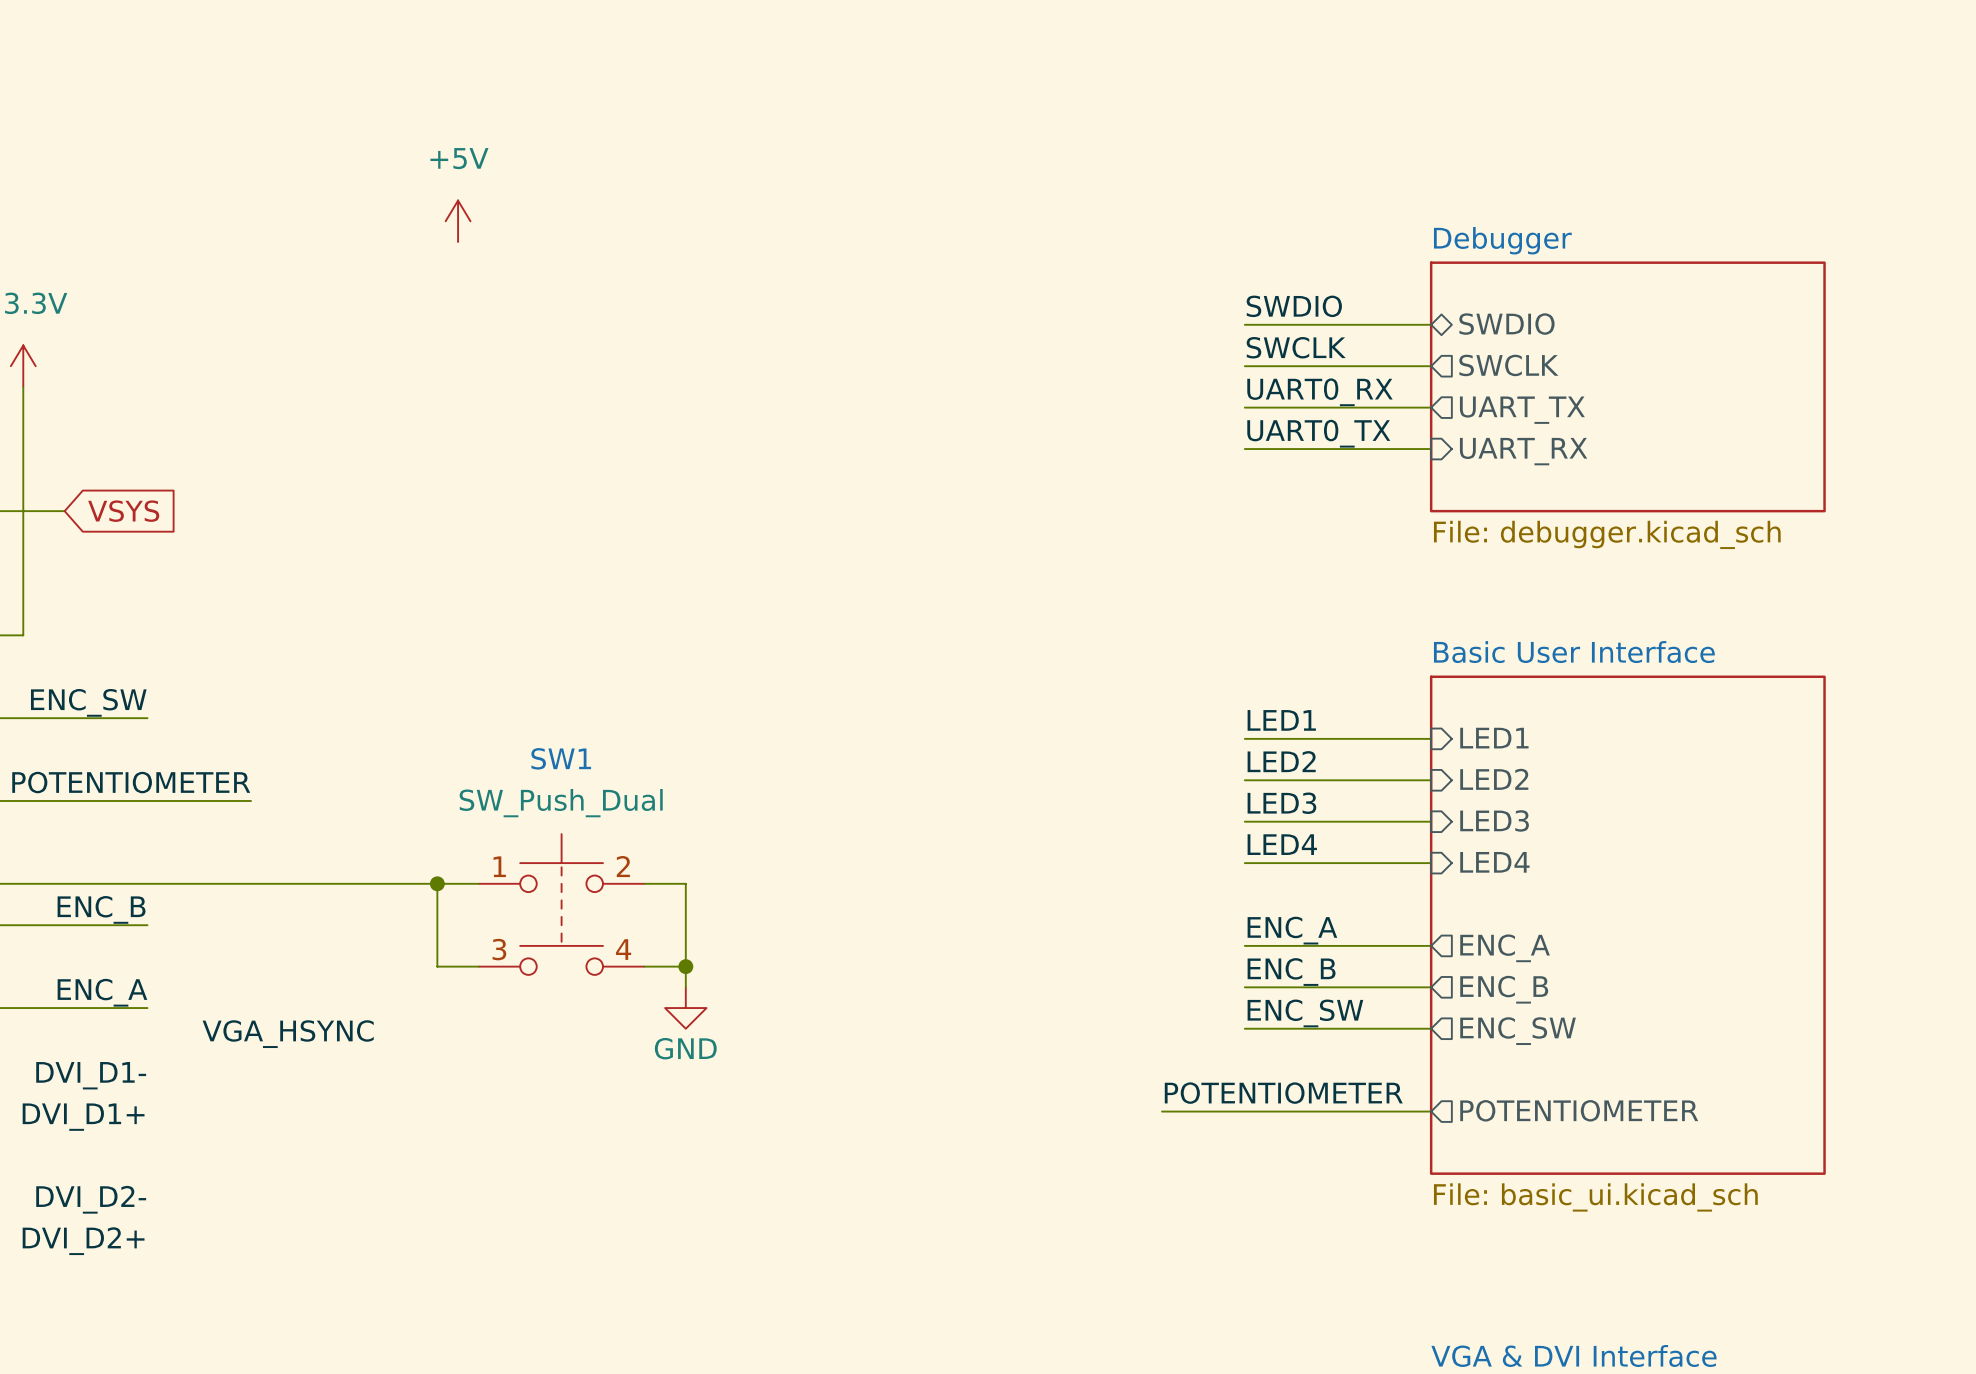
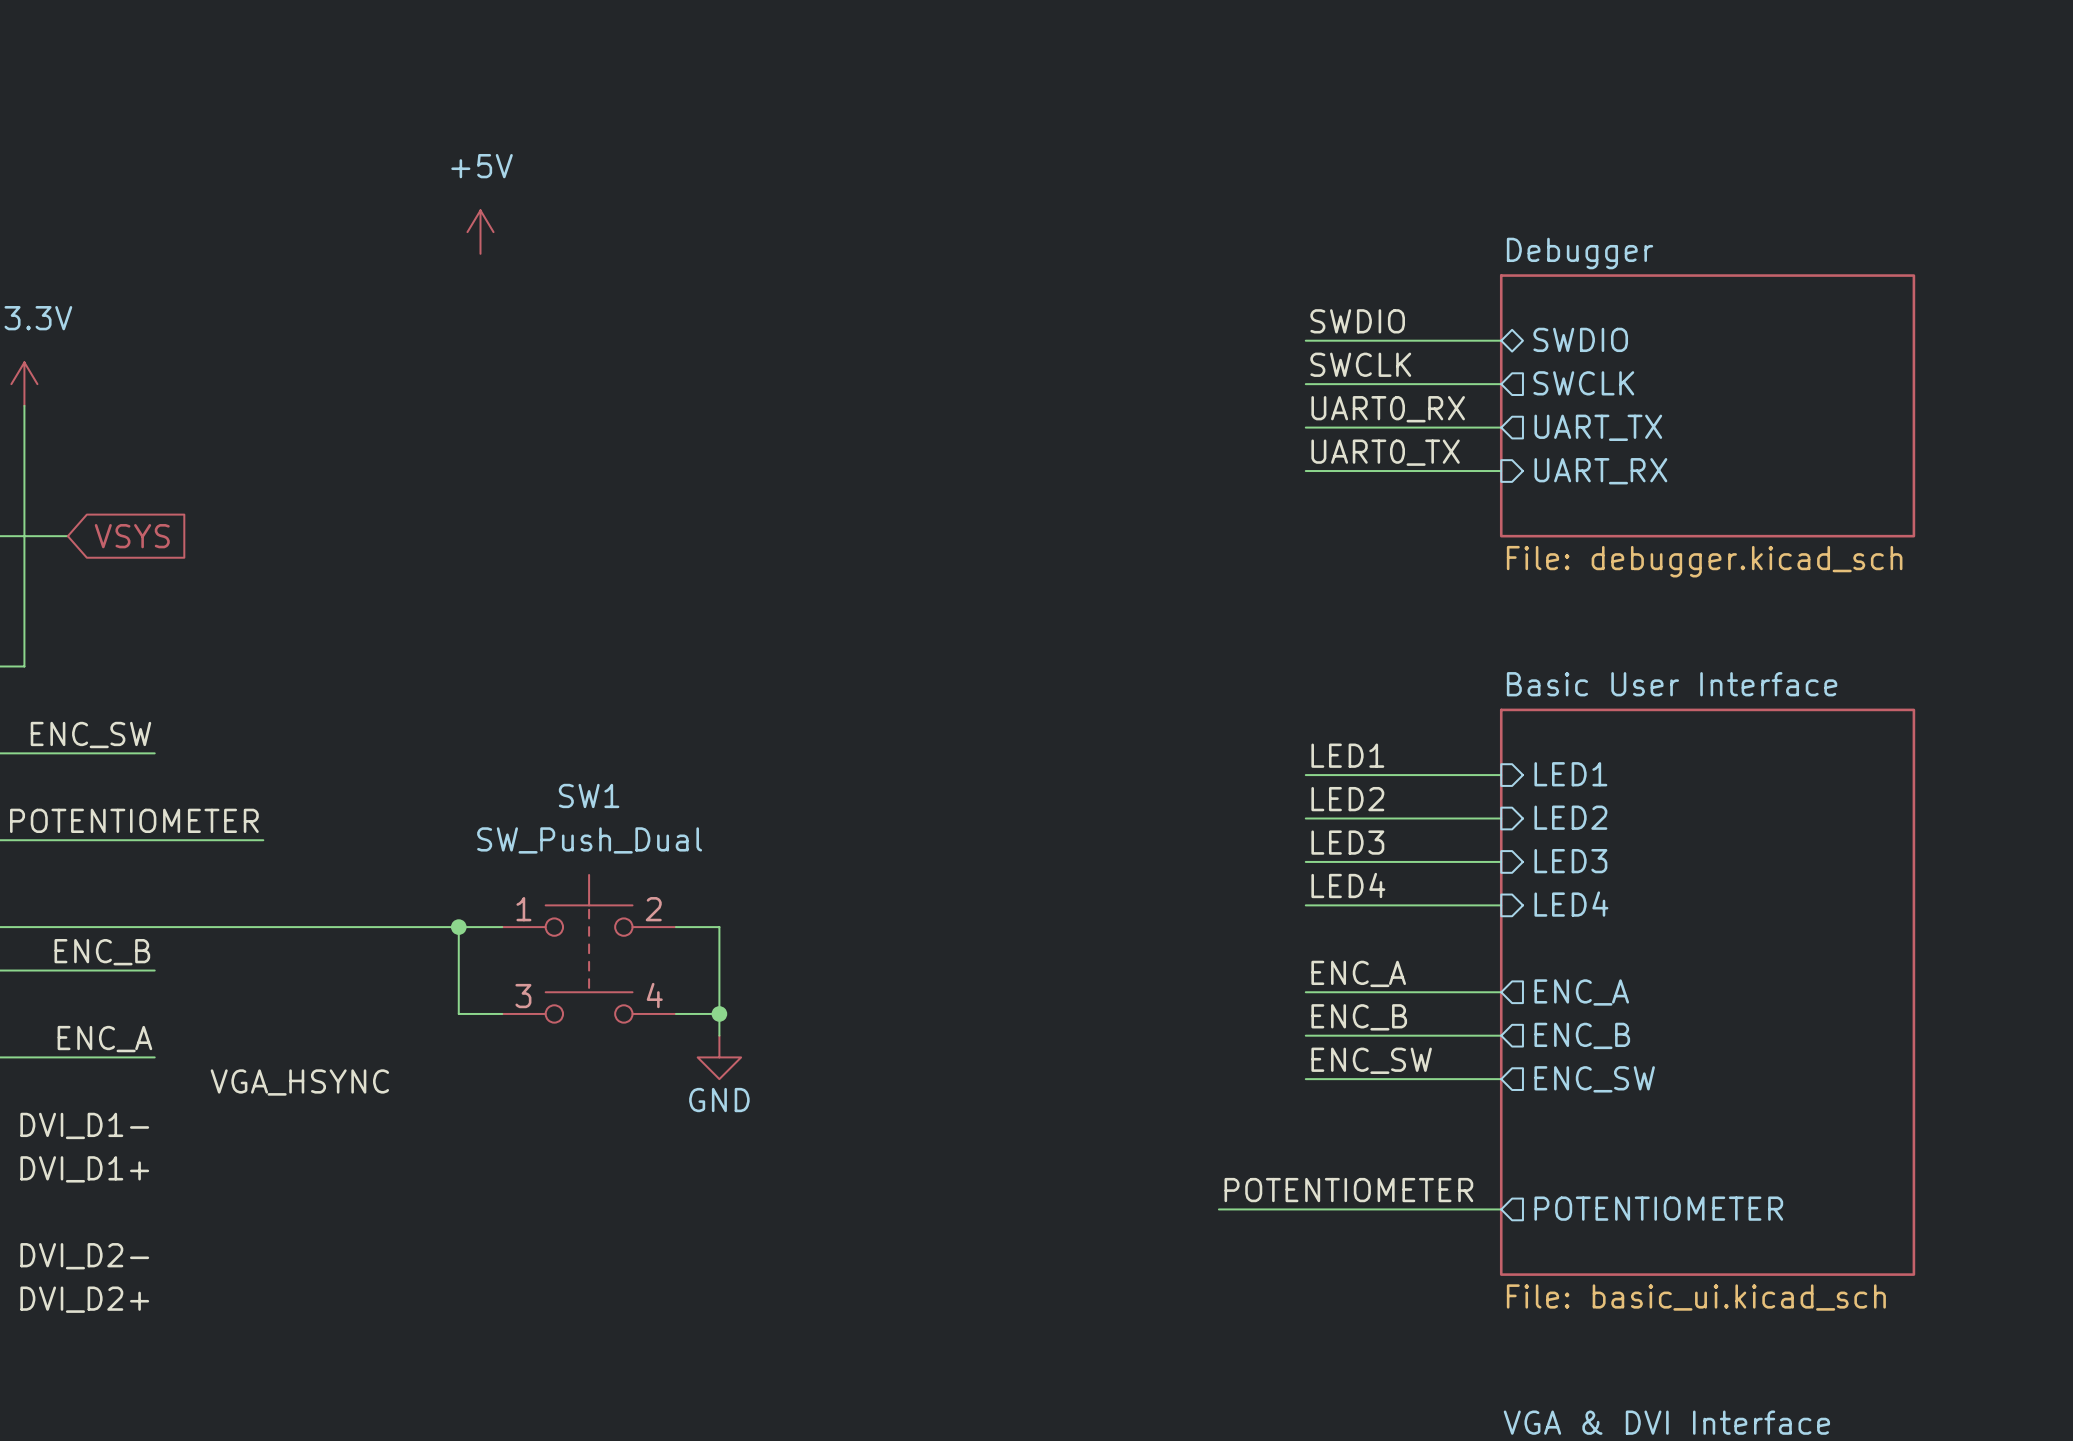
sheet Basic User Interface: File: basic_ui.kicad_sch (1627, 925) -> none
sheet Basic User Interface: none -> File: basic_ui.kicad_sch (1707, 992)
label position: POTENTIOMETER (1283, 1093) -> POTENTIOMETER (1348, 1190)
sheet pin position: POTENTIOMETER (1579, 1110) -> POTENTIOMETER (1658, 1208)
wire: (1162, 1111) (1431, 1111) -> (1218, 1209) (1501, 1209)

